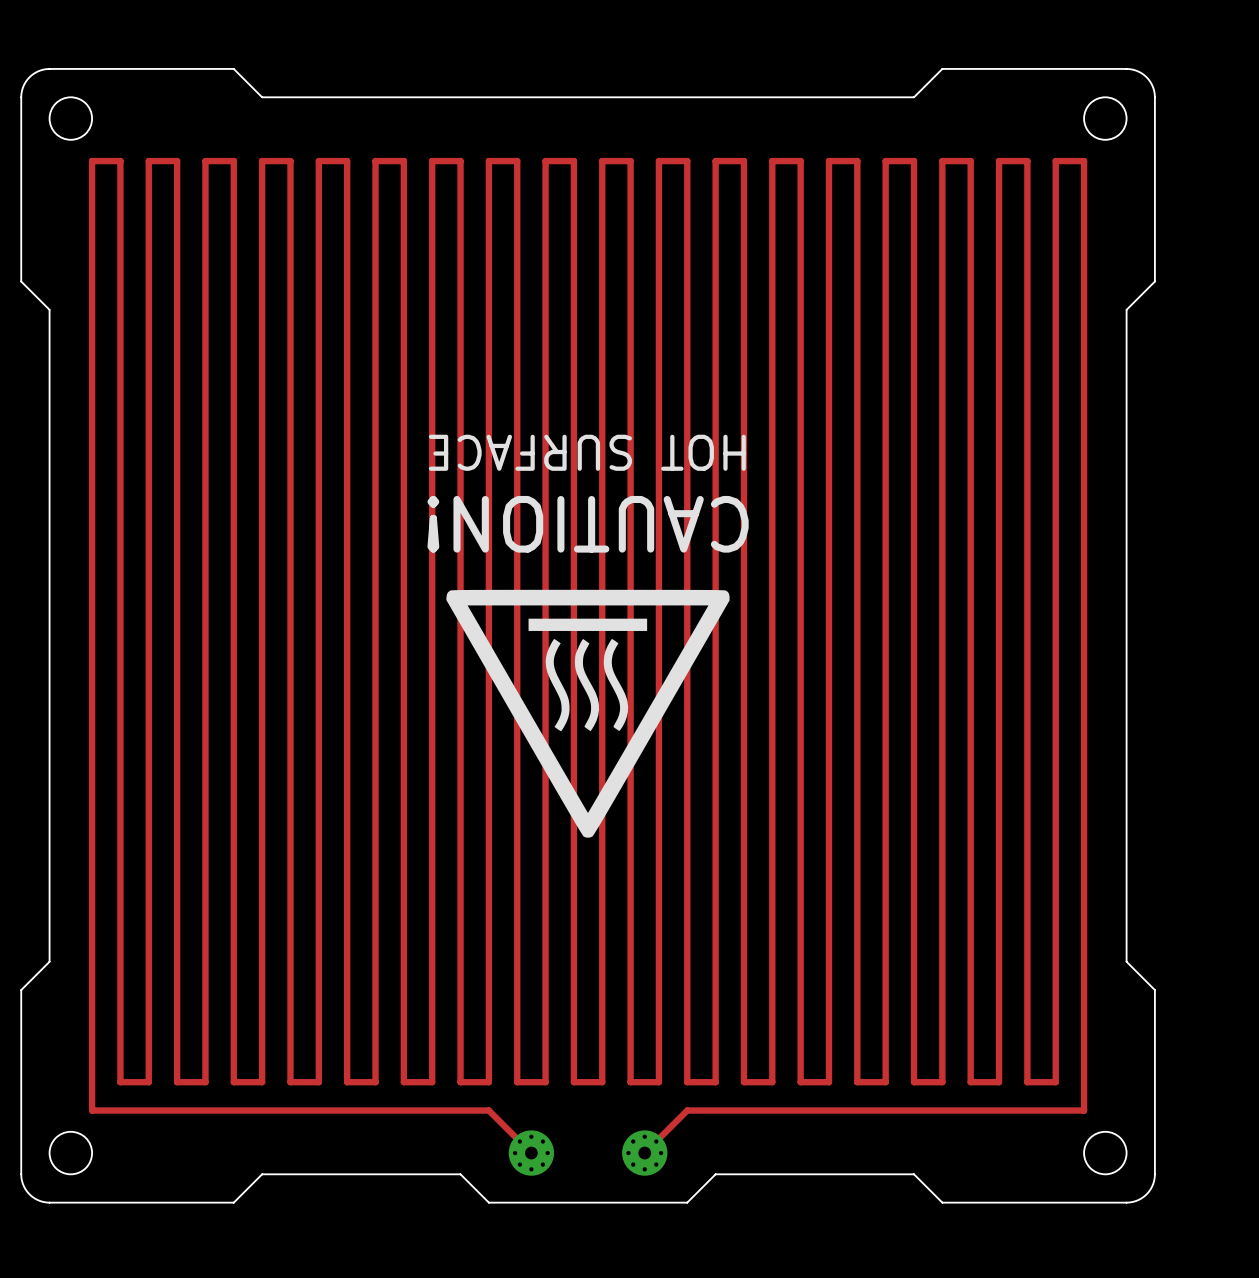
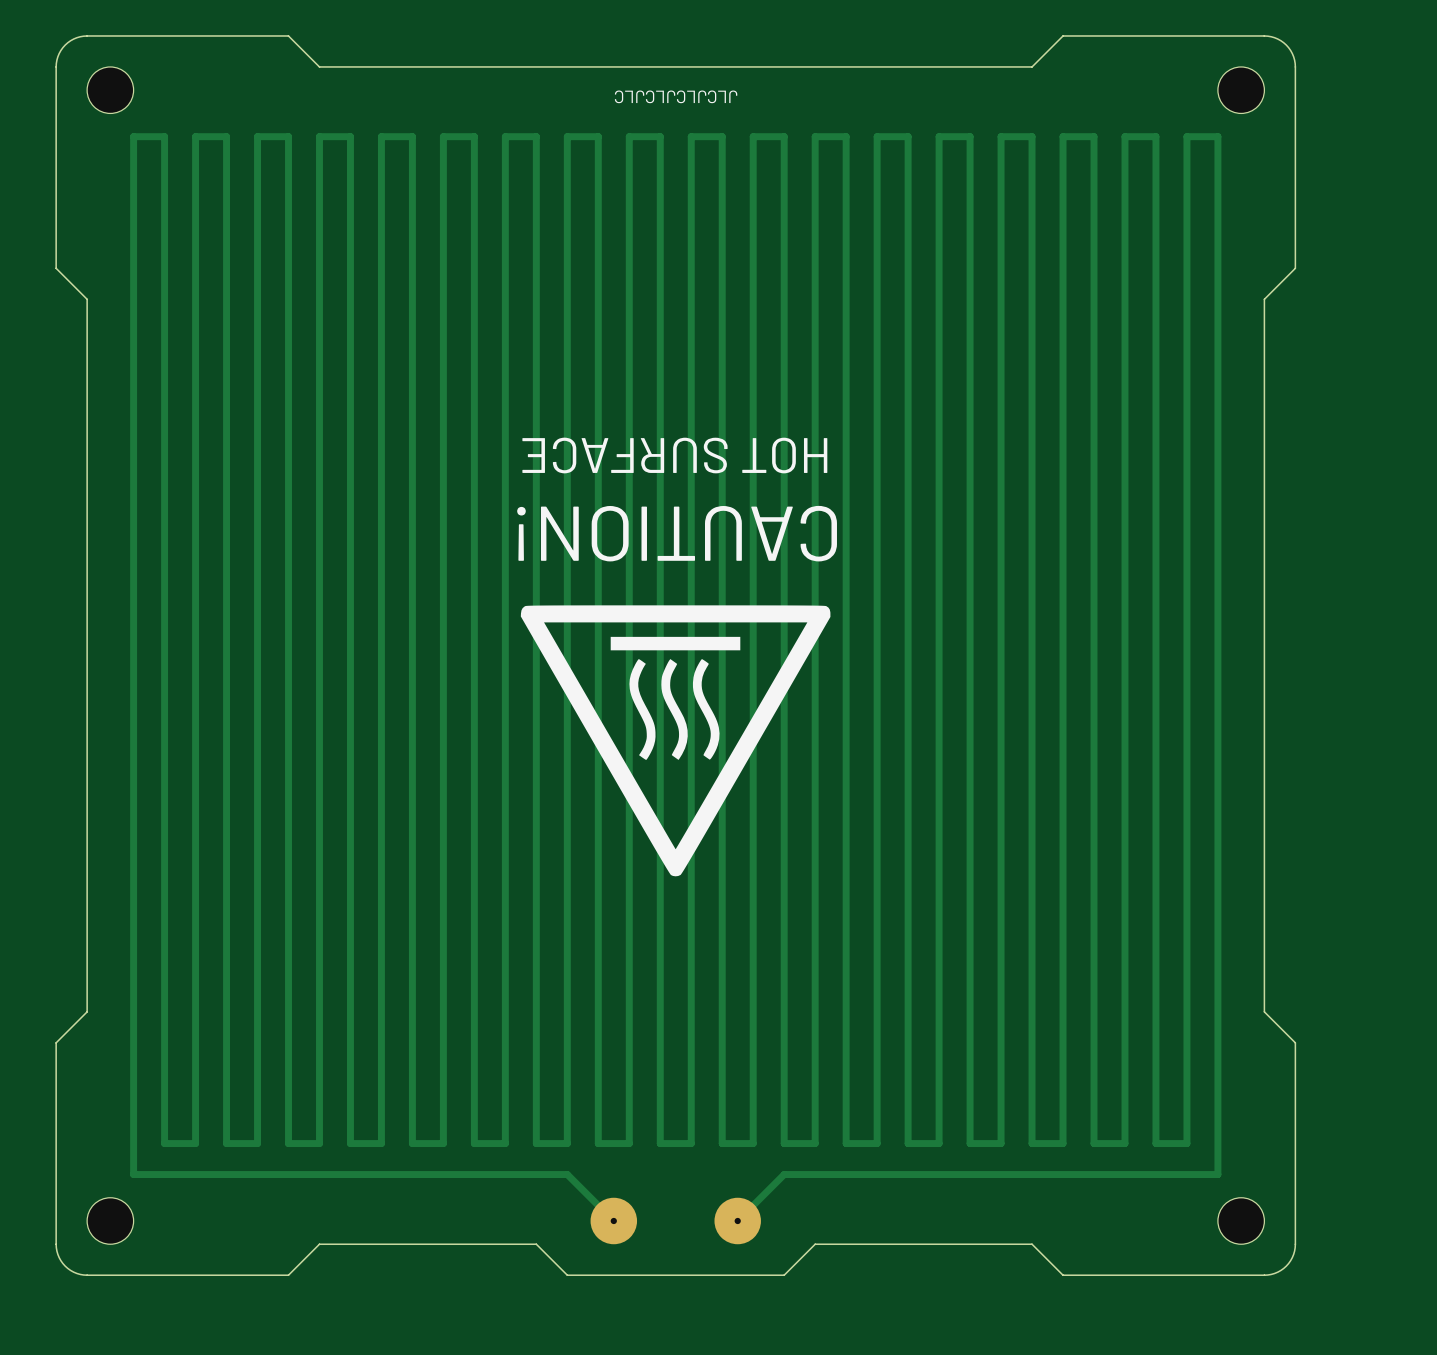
text: none -> JLCJLCJLCJLC (676, 96)
part footprint: [508, 1130, 555, 1176] -> [590, 1197, 638, 1245]
part footprint: [622, 1130, 668, 1176] -> [714, 1197, 761, 1245]

